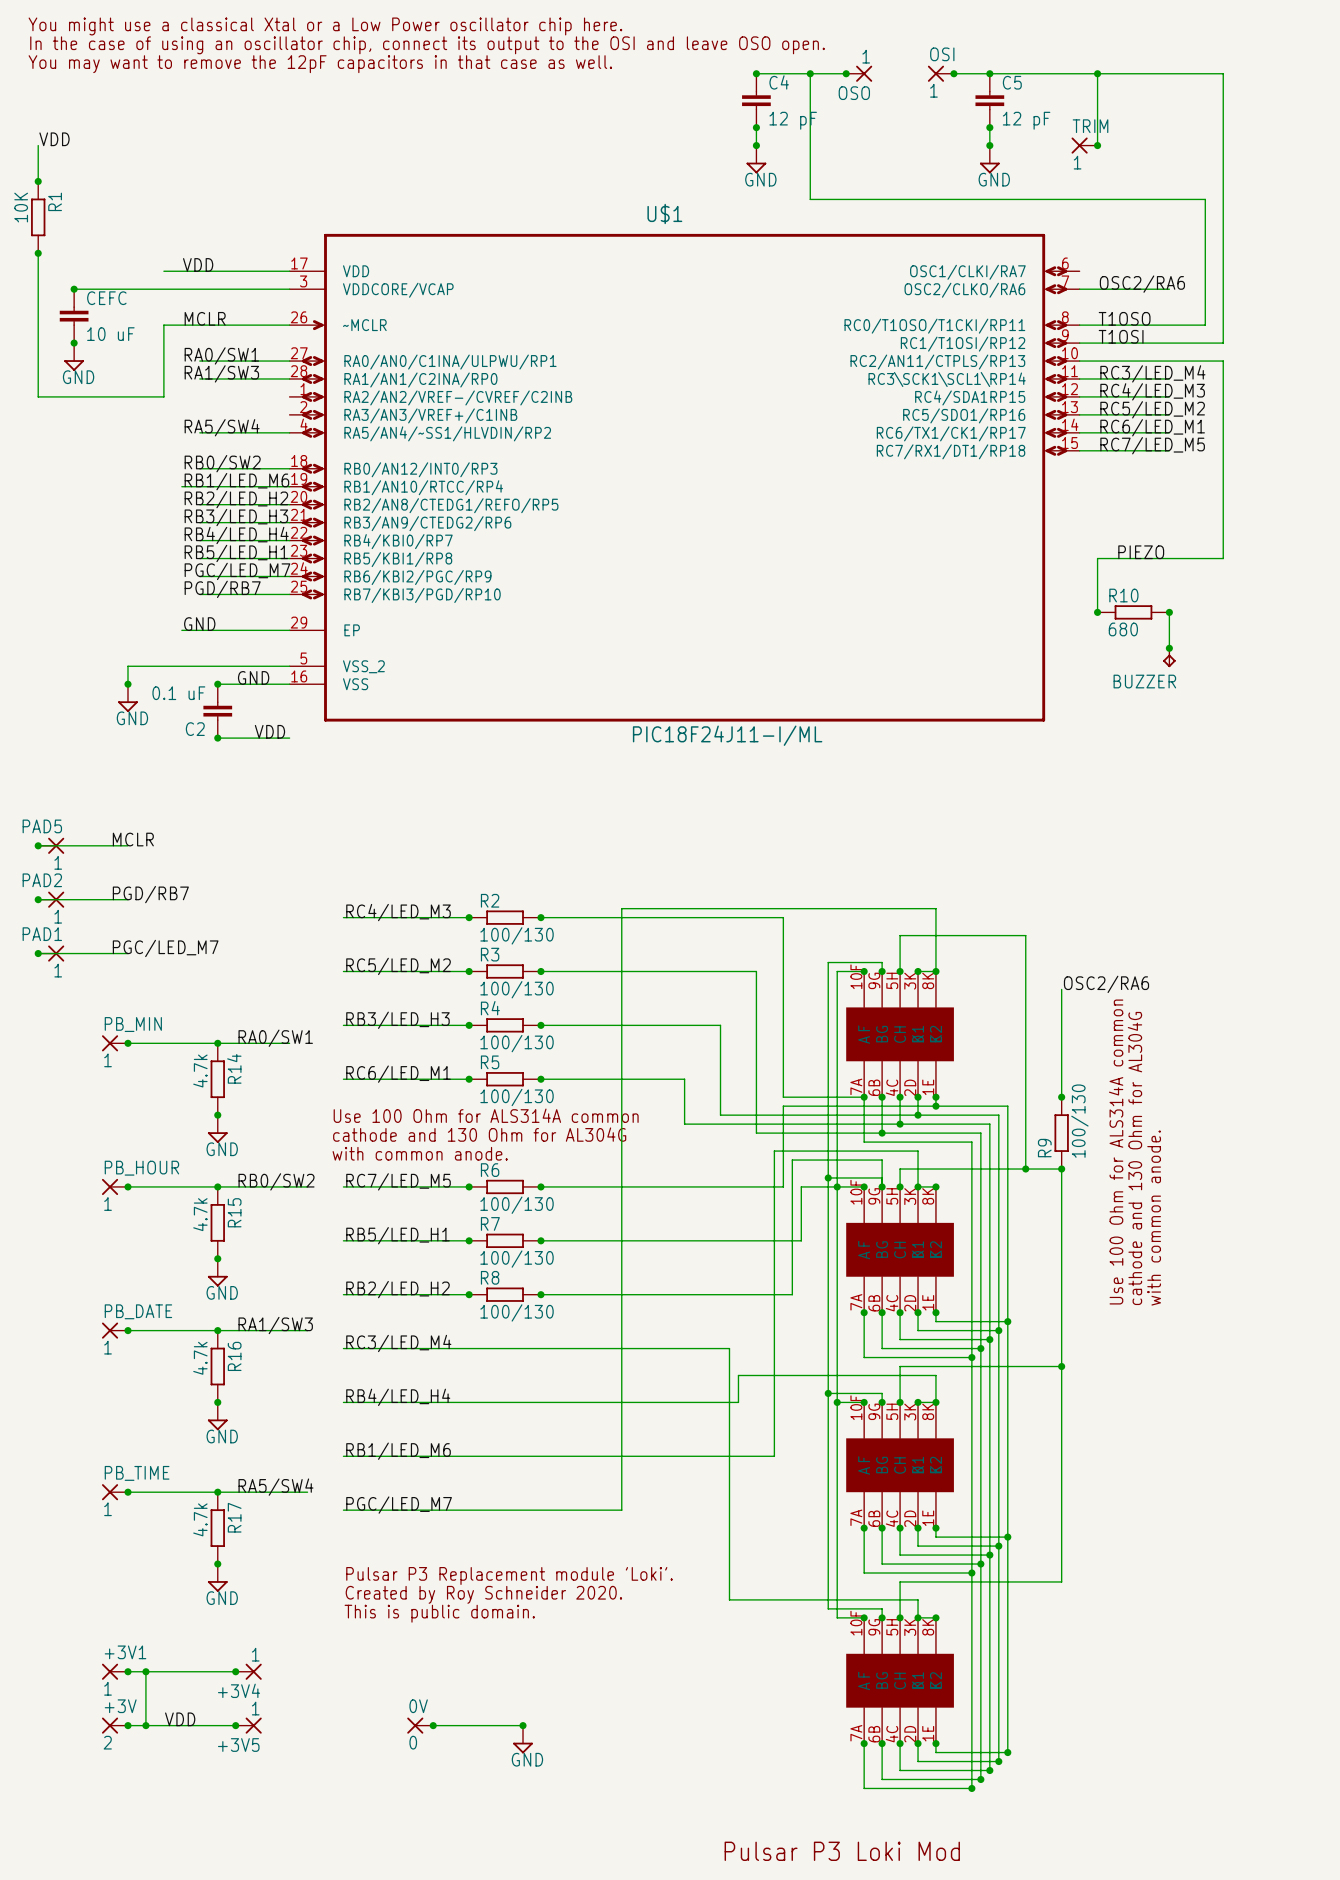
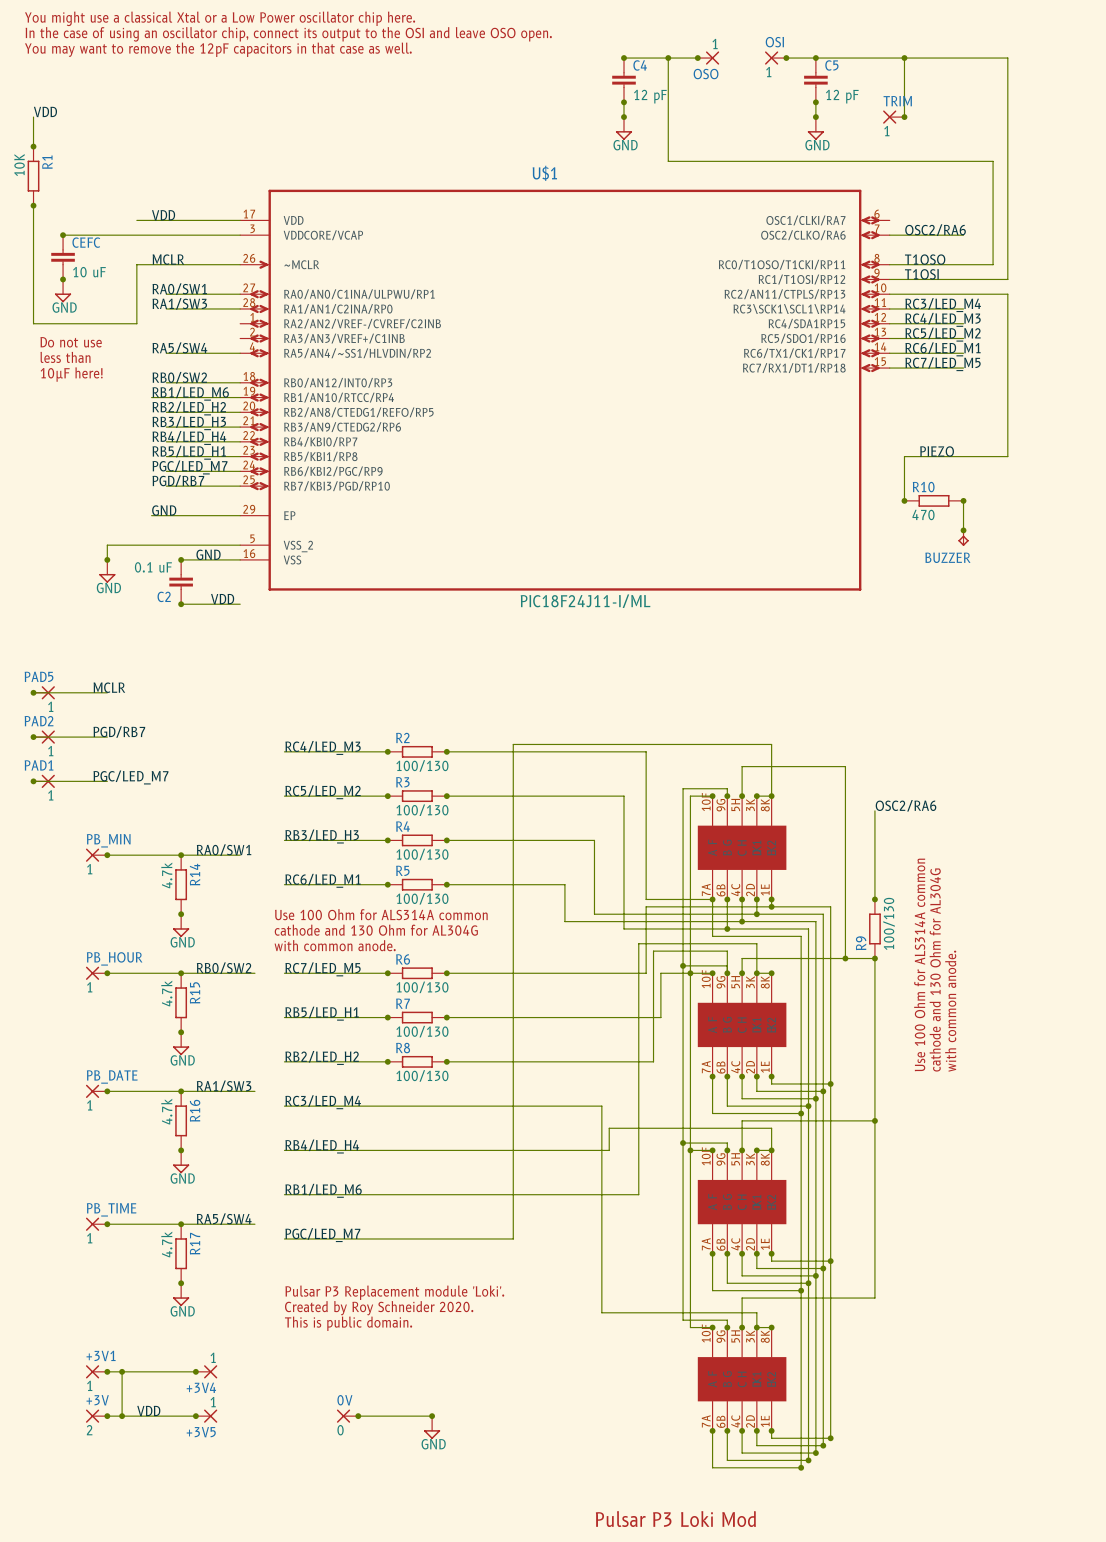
text: none -> Do not use (71, 342)
text: none -> less than (65, 357)
text: none -> 10µF here! (71, 374)
R10 value: 680 (1123, 629) -> 470 (923, 514)

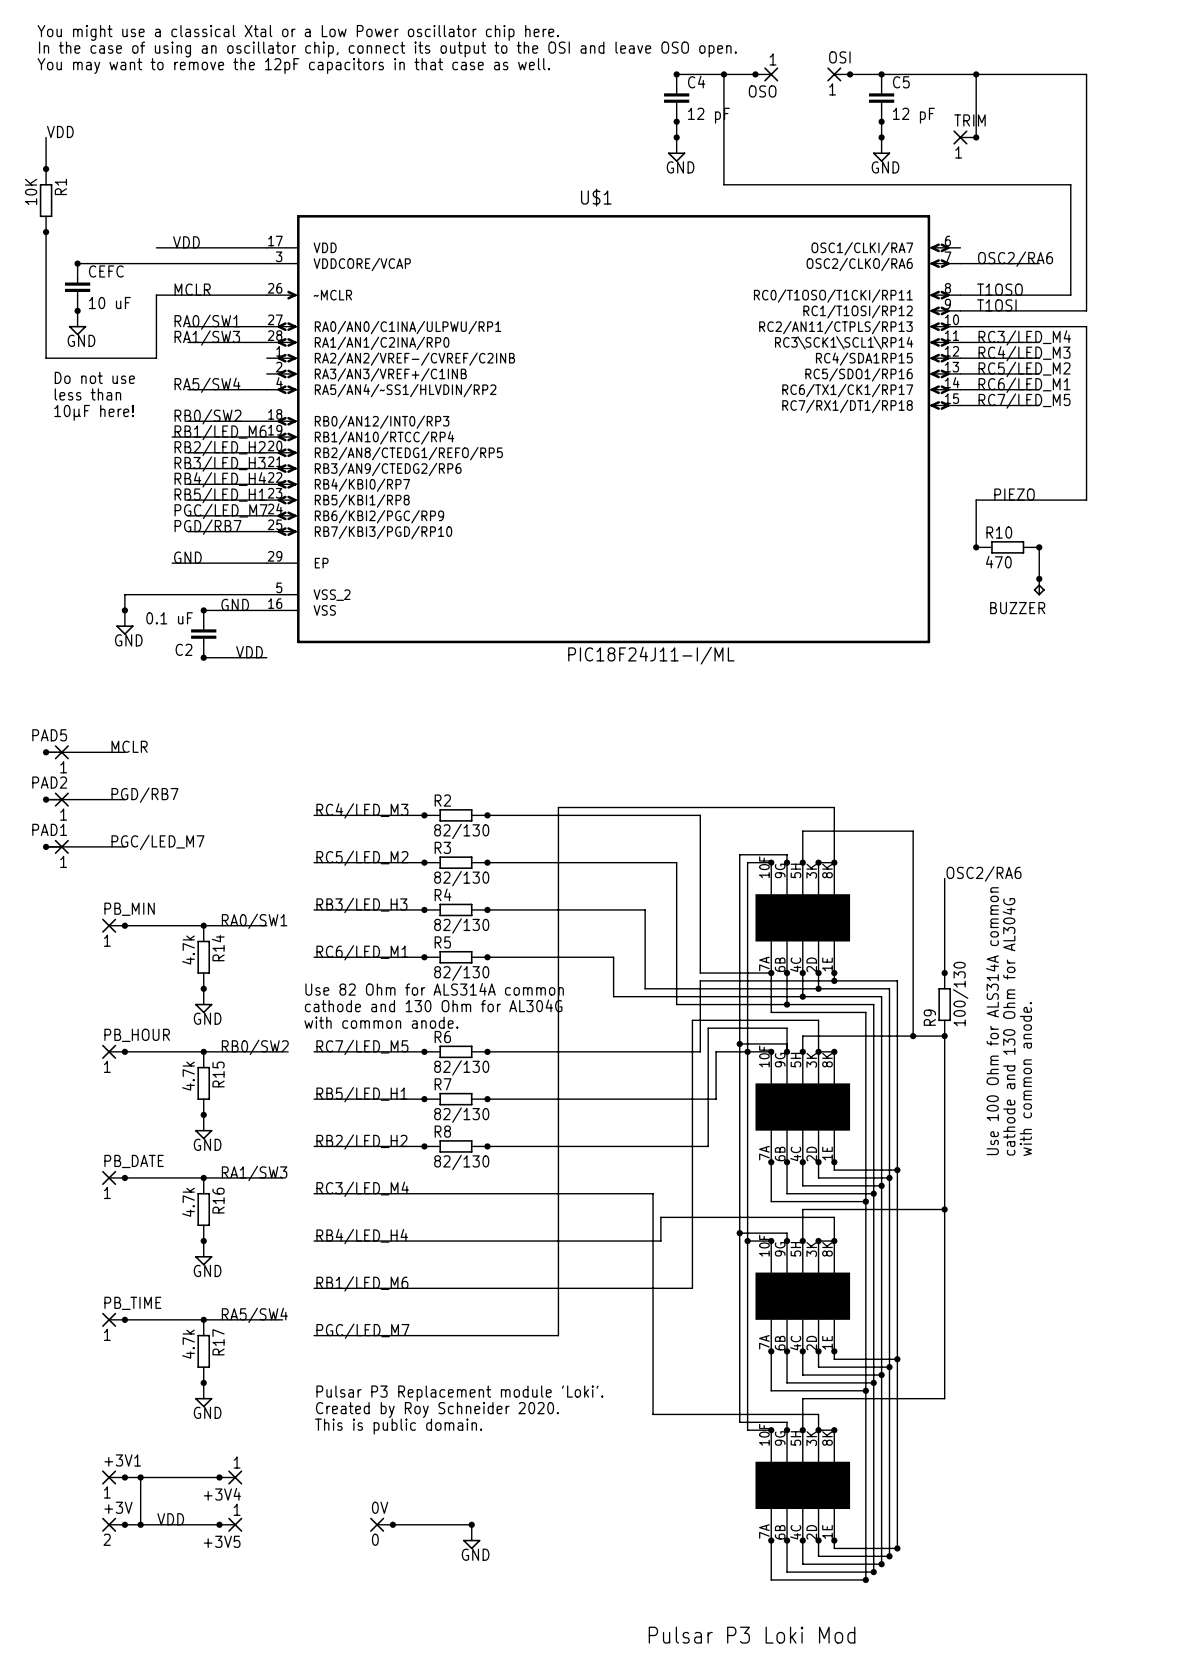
R2 value: 100/130 (422, 765) -> 82/130 (461, 831)
R3 value: 100/130 (422, 810) -> 82/130 (461, 878)
R4 value: 100/130 (422, 854) -> 82/130 (461, 925)
R5 value: 100/130 (422, 898) -> 82/130 (461, 973)
text: Use 100 Ohm for ALS314A common (381, 914) -> Use 82 Ohm for ALS314A common (434, 989)
R6 value: 100/130 (422, 987) -> 82/130 (461, 1067)
R7 value: 100/130 (422, 1031) -> 82/130 (461, 1115)
R8 value: 100/130 (422, 1075) -> 82/130 (461, 1162)

